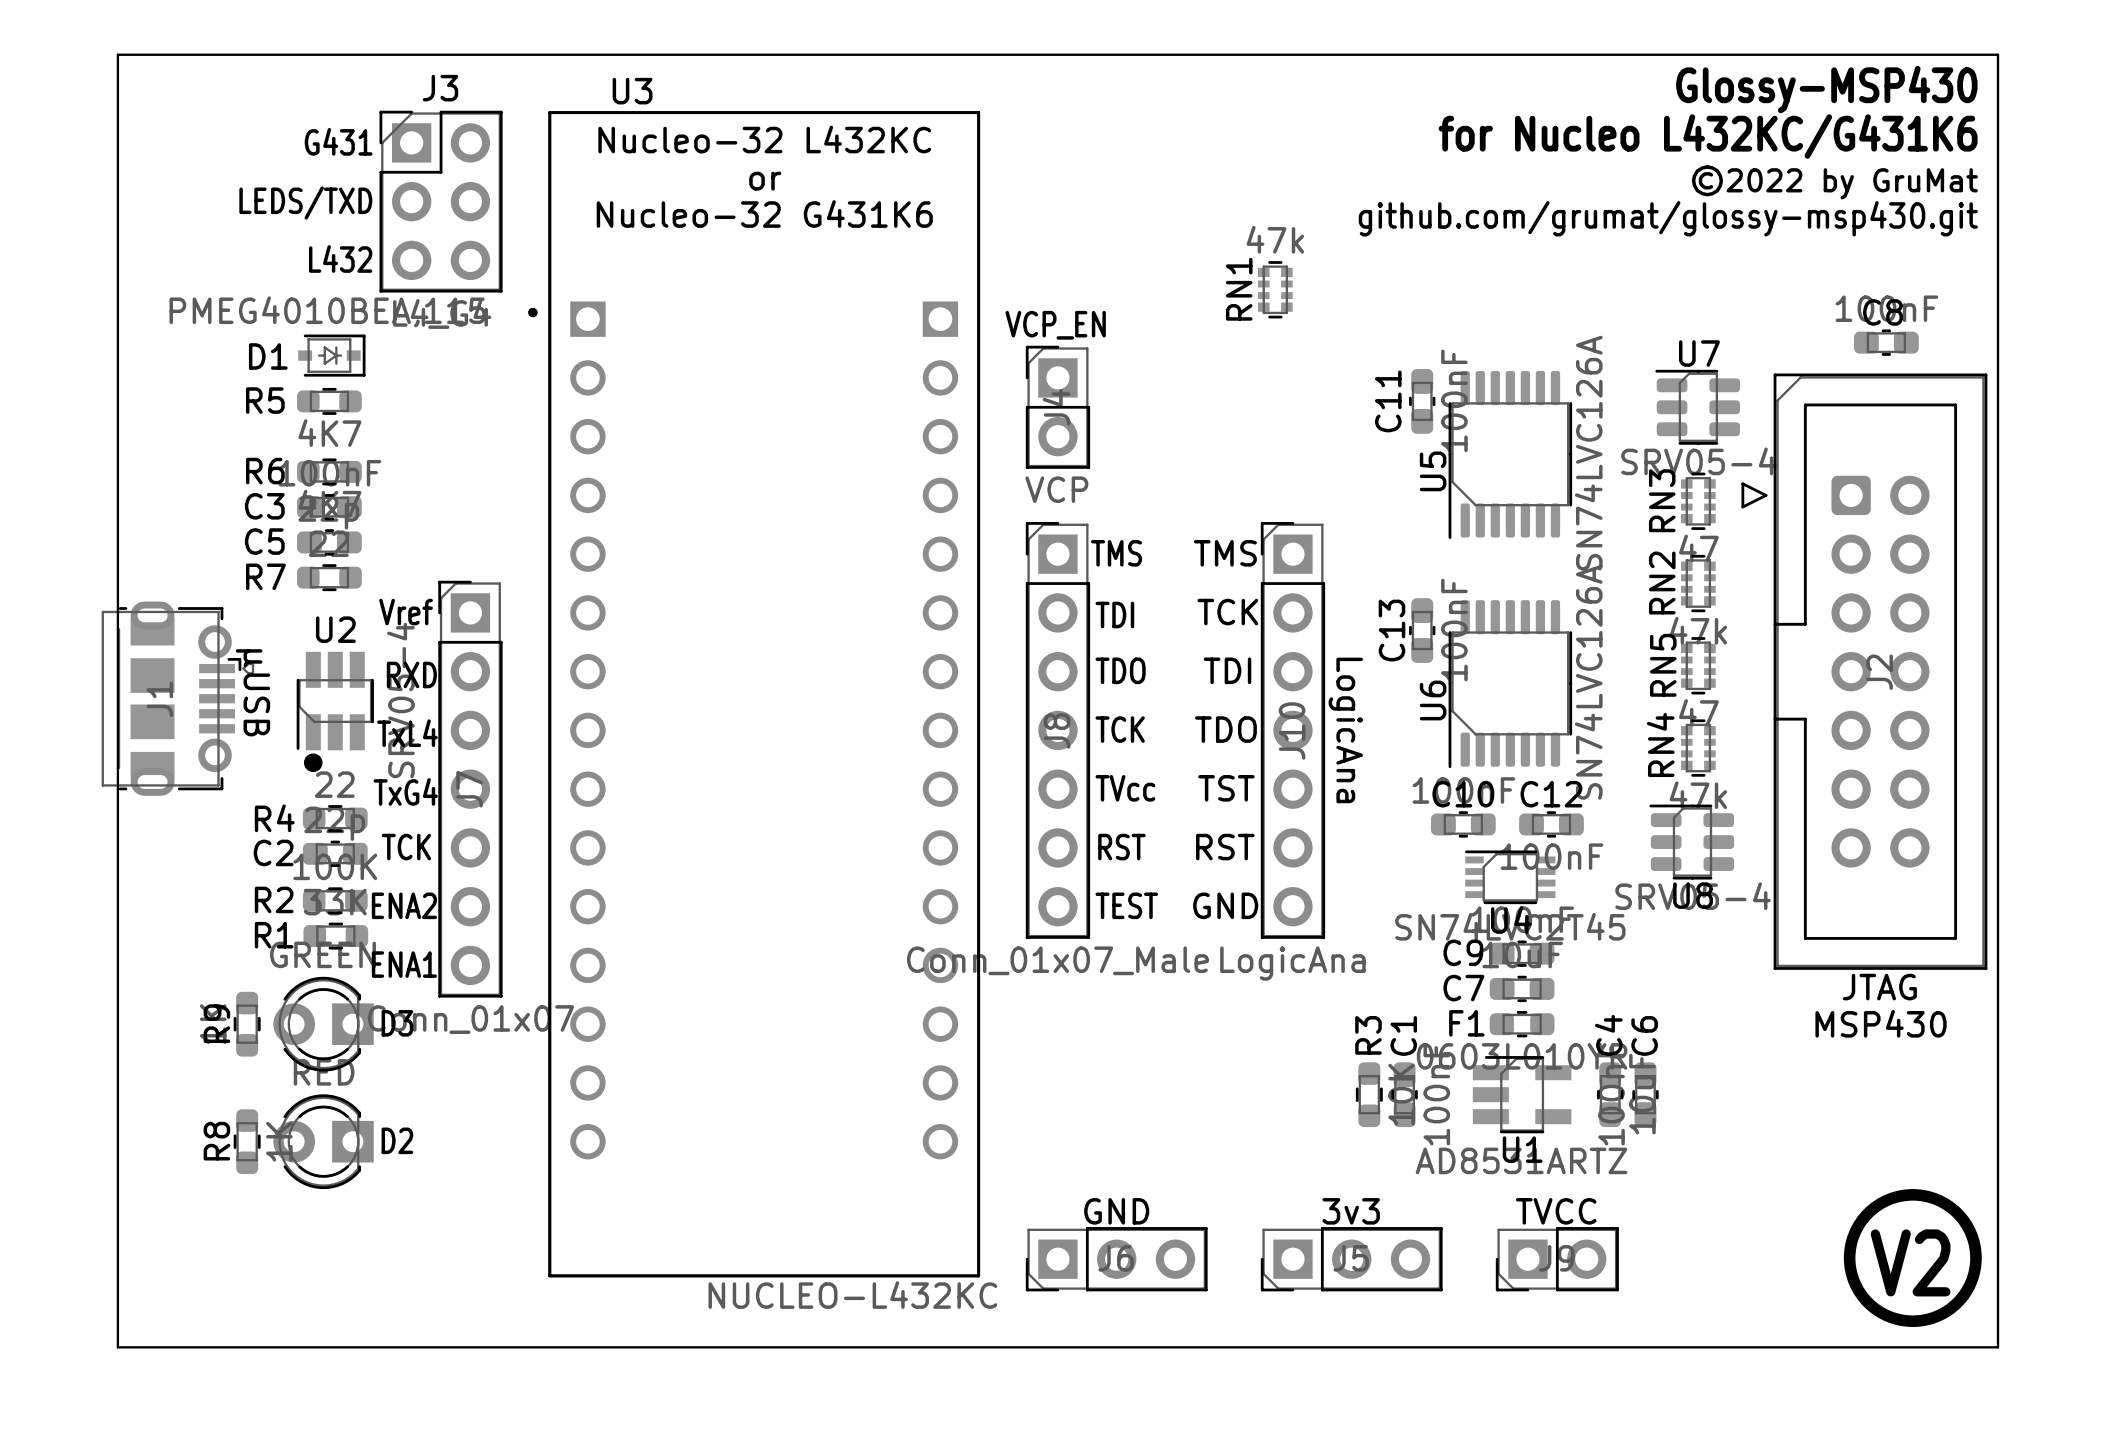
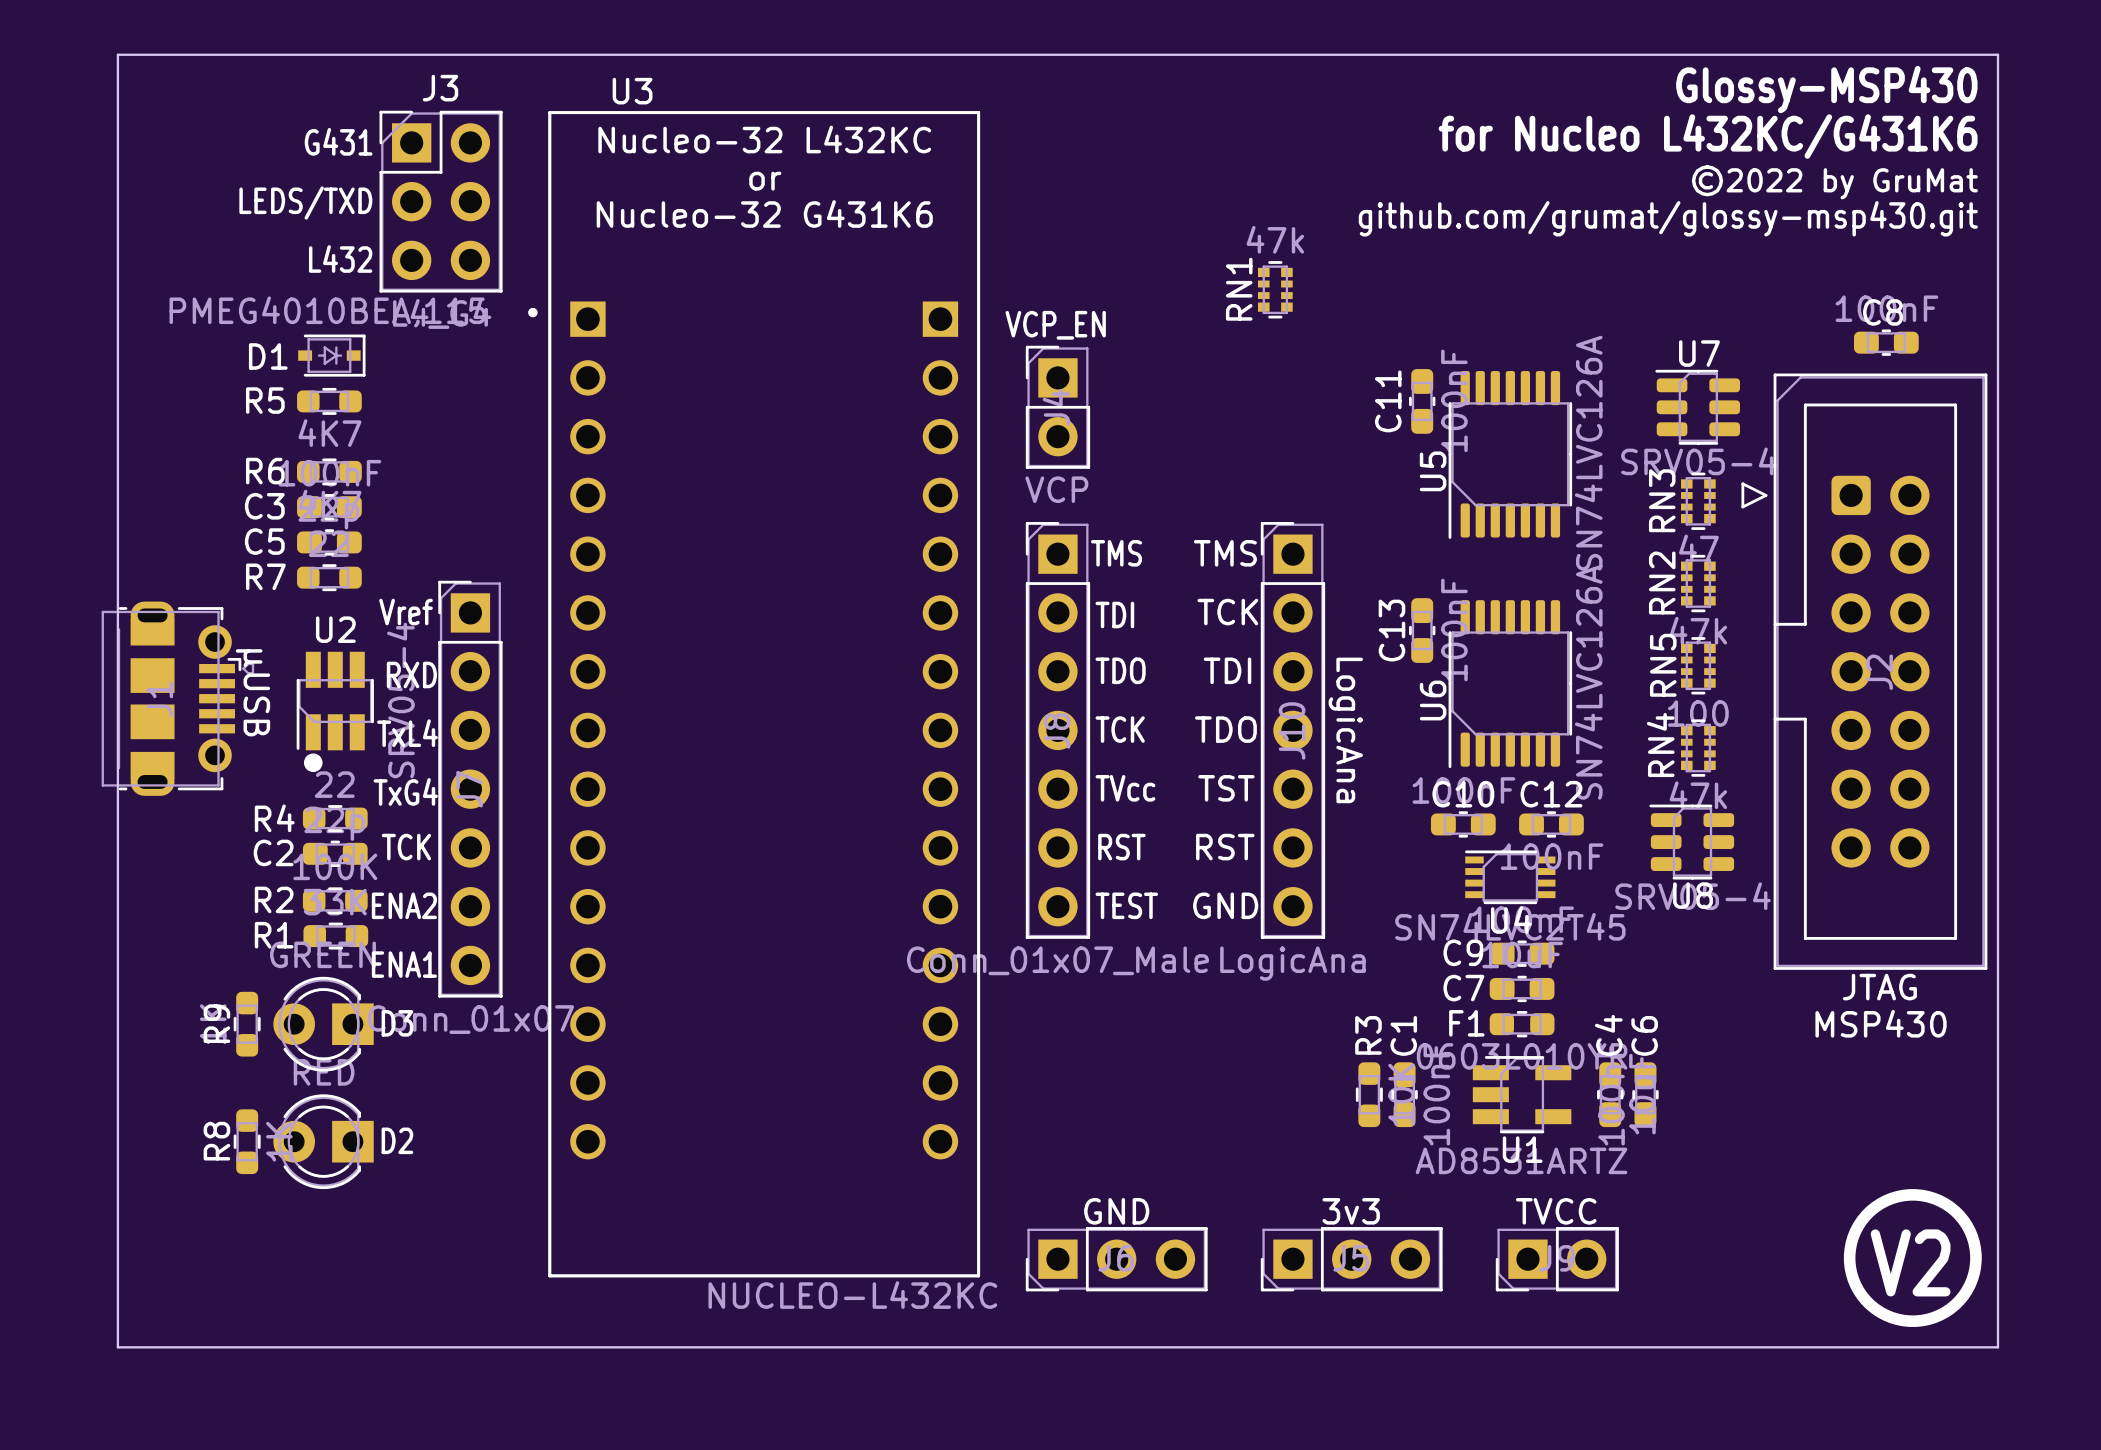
RN5 value: 47 (1698, 712) -> 100 (1698, 713)

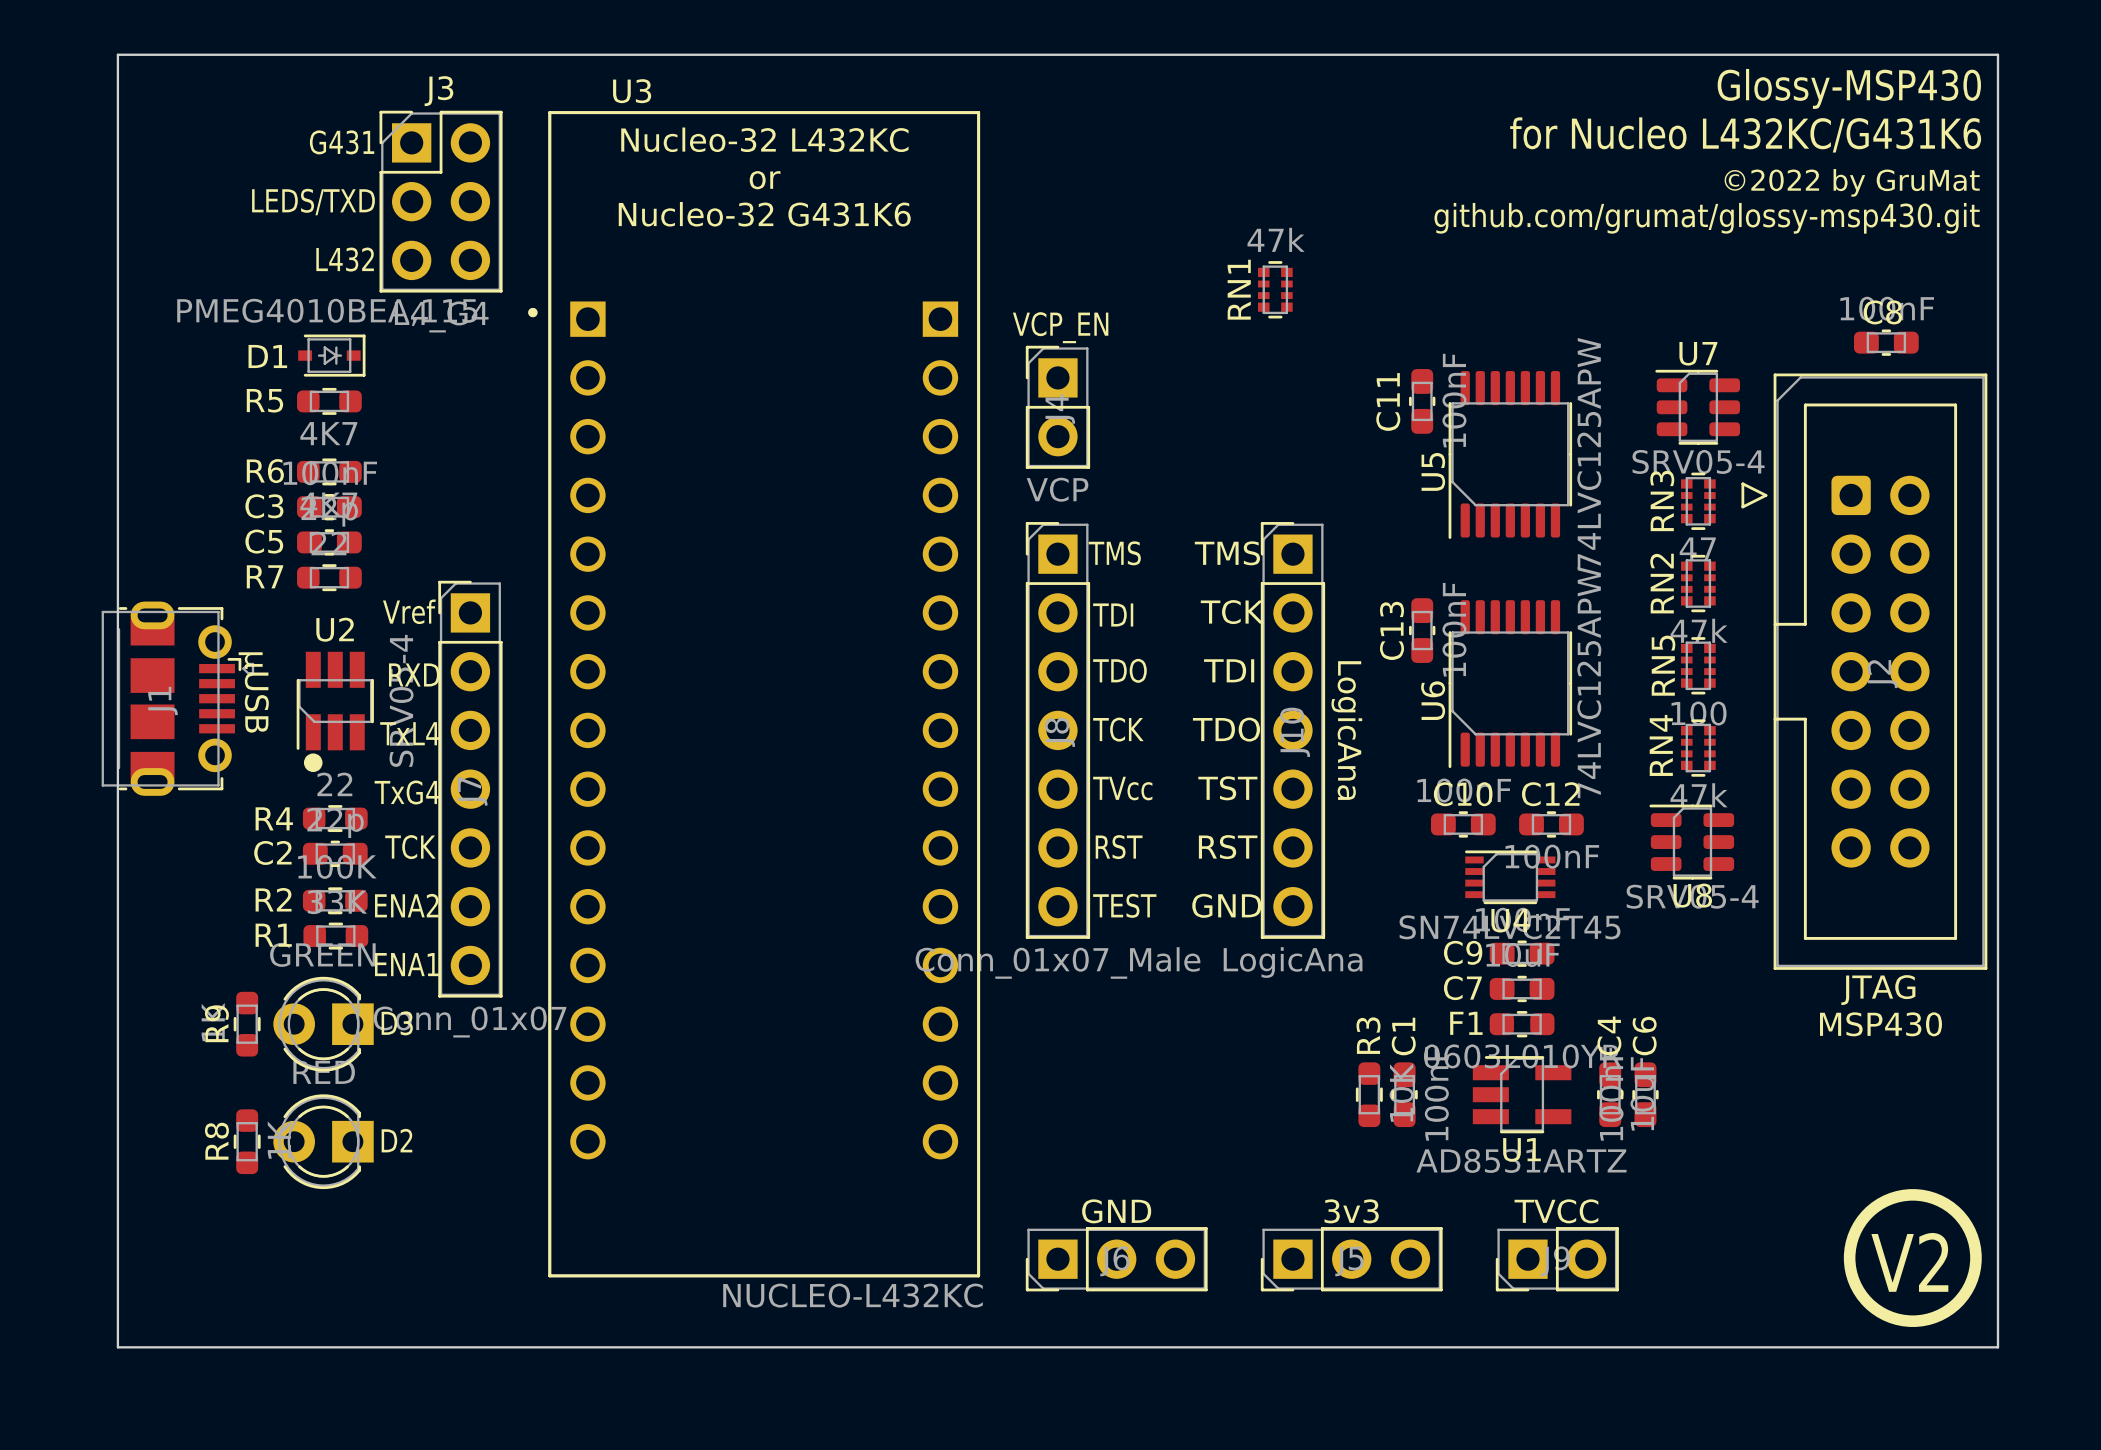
U5 value: SN74LVC126A (1588, 453) -> 74LVC125APW (1589, 453)
U6 value: SN74LVC126A (1588, 682) -> 74LVC125APW (1589, 682)

